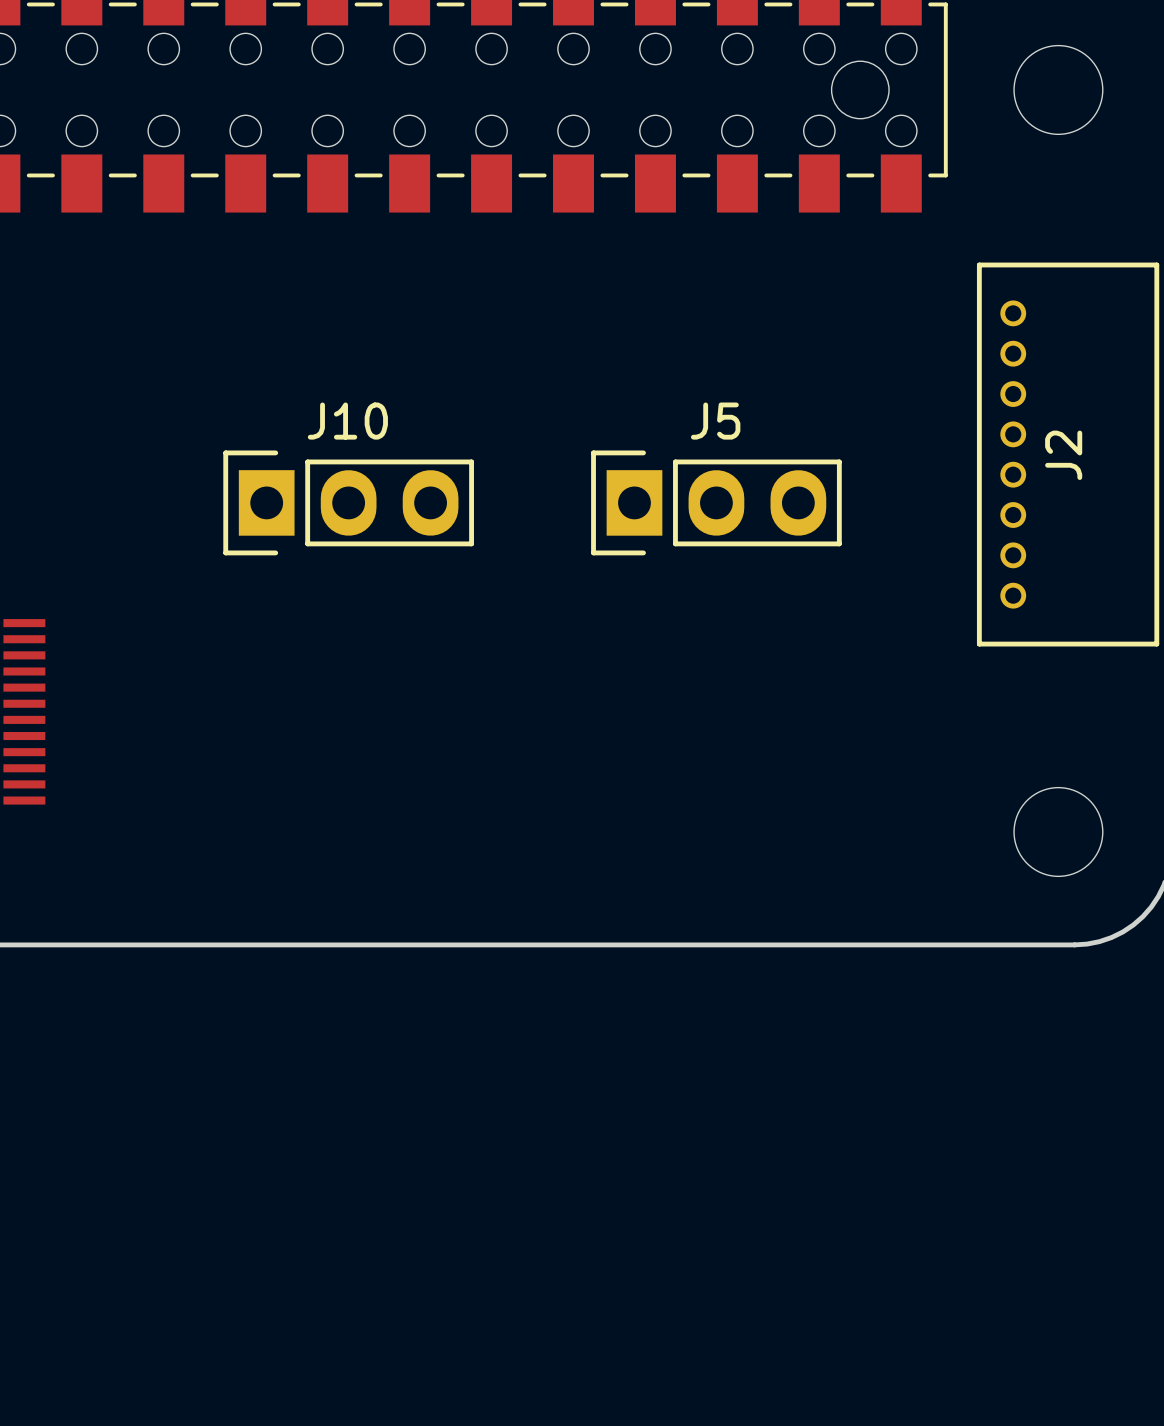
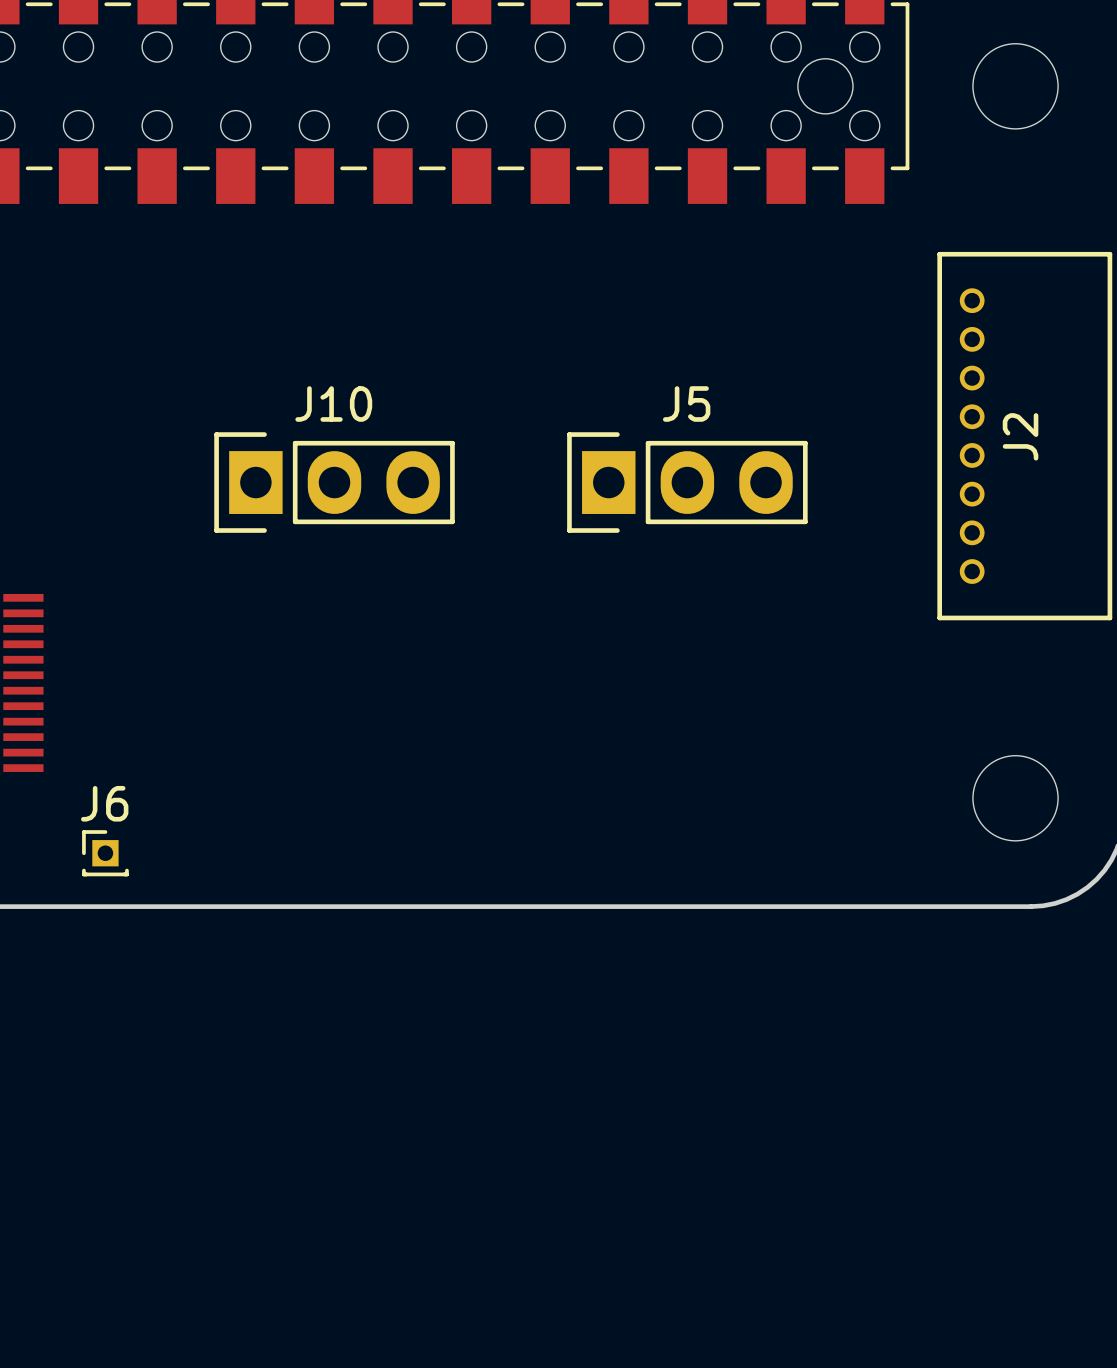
J6: none -> (105, 853)

